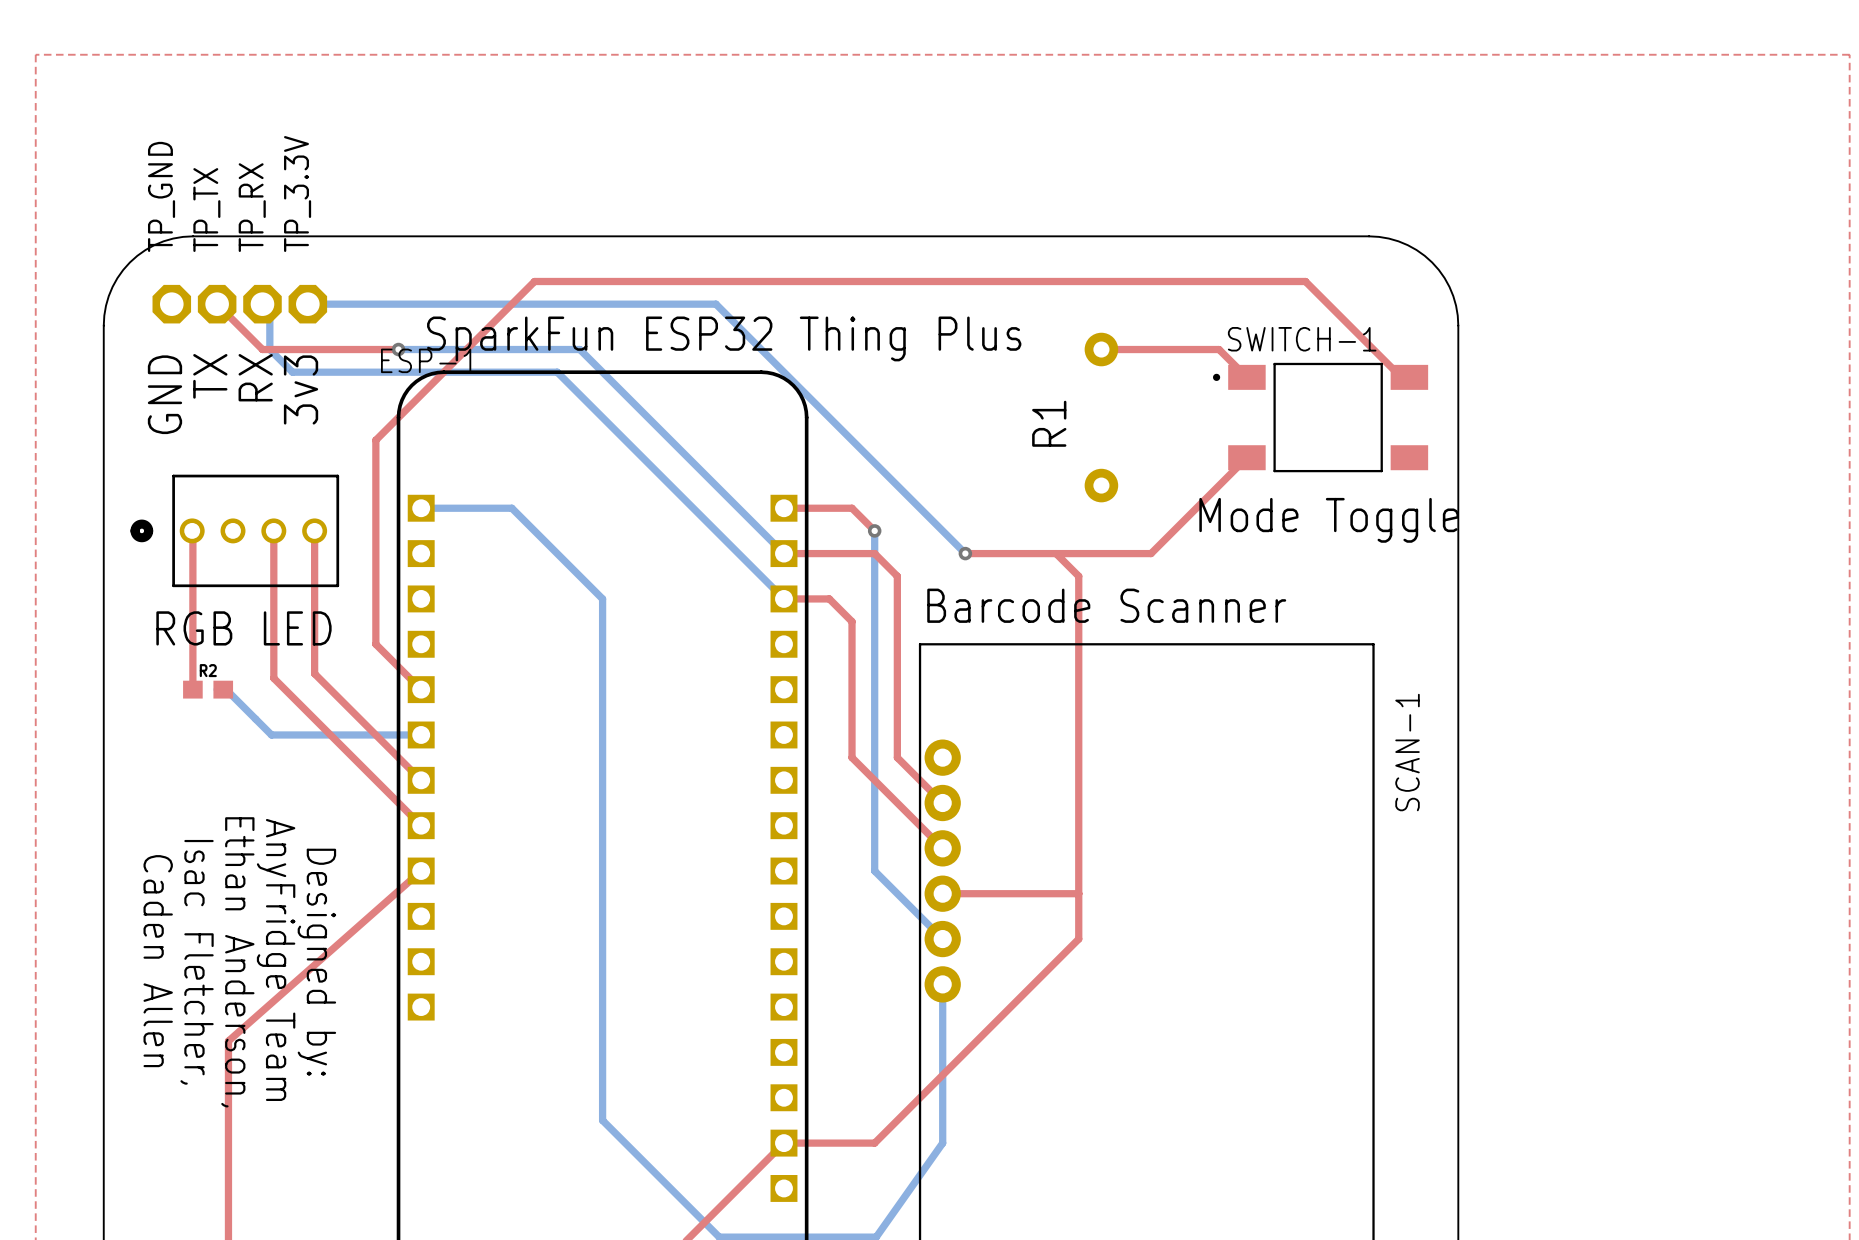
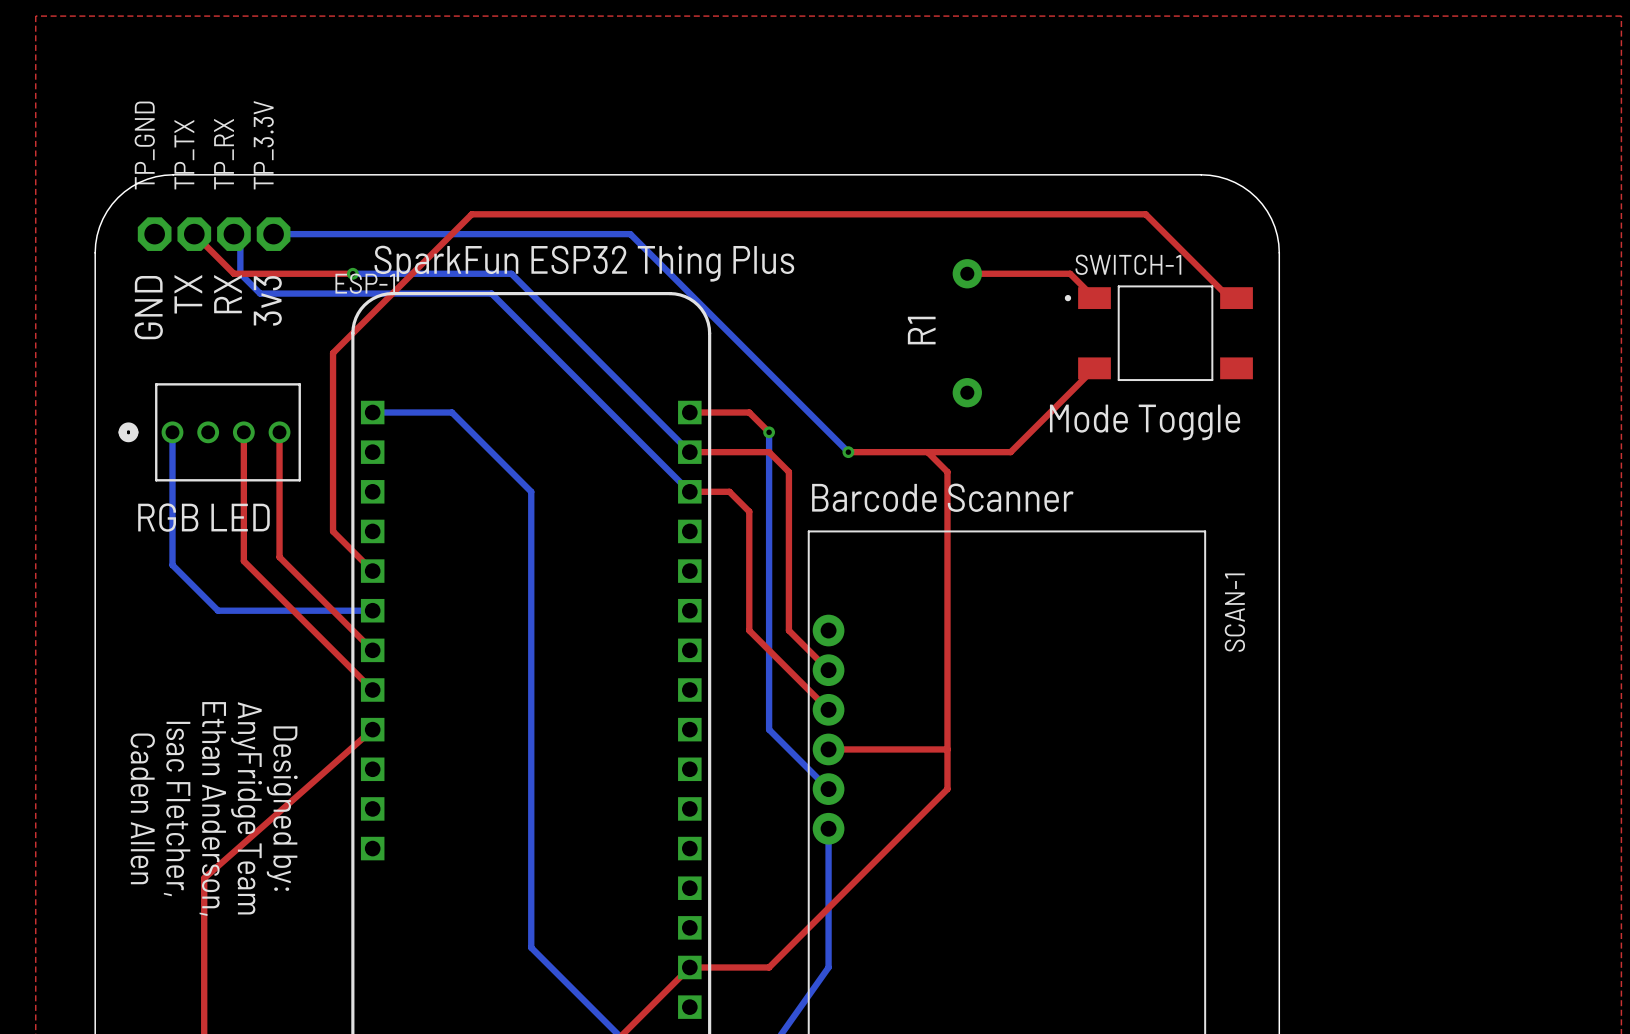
top track: (192, 530) (192, 689) -> none
R2: (208, 689) -> none
bottom track: (217, 689) (226, 689) (271, 734) -> (172, 432) (172, 565) (218, 610) (241, 610)

